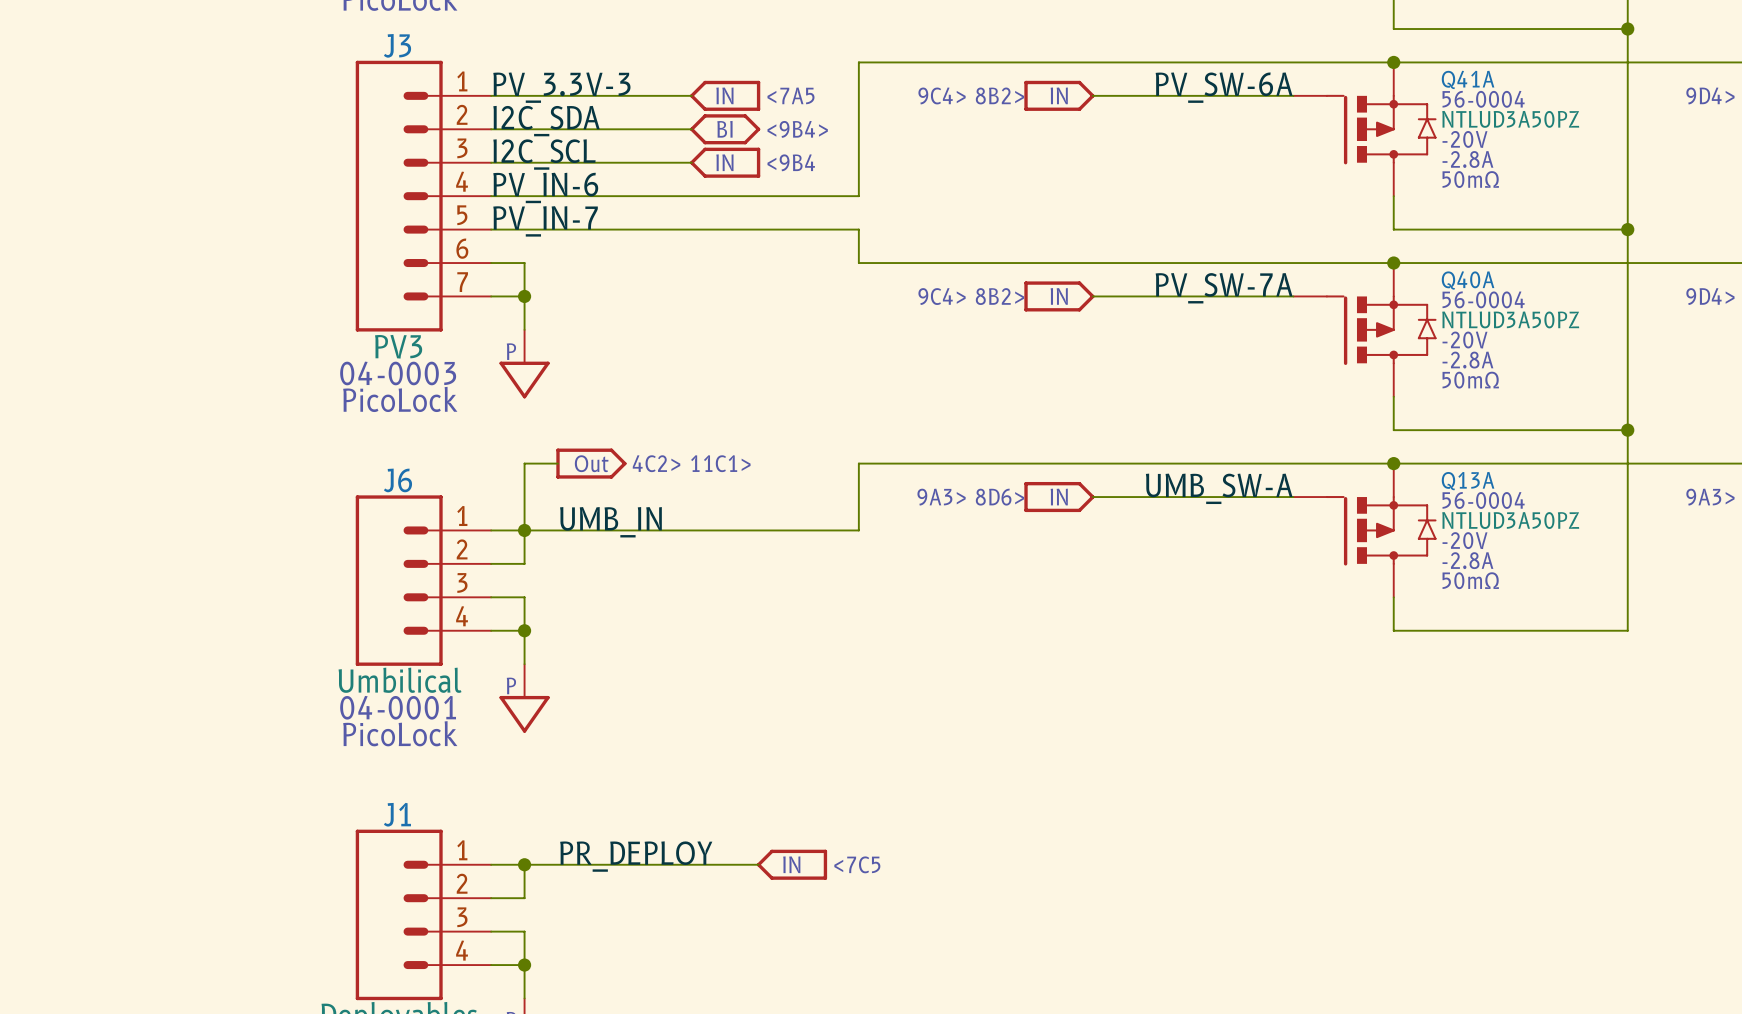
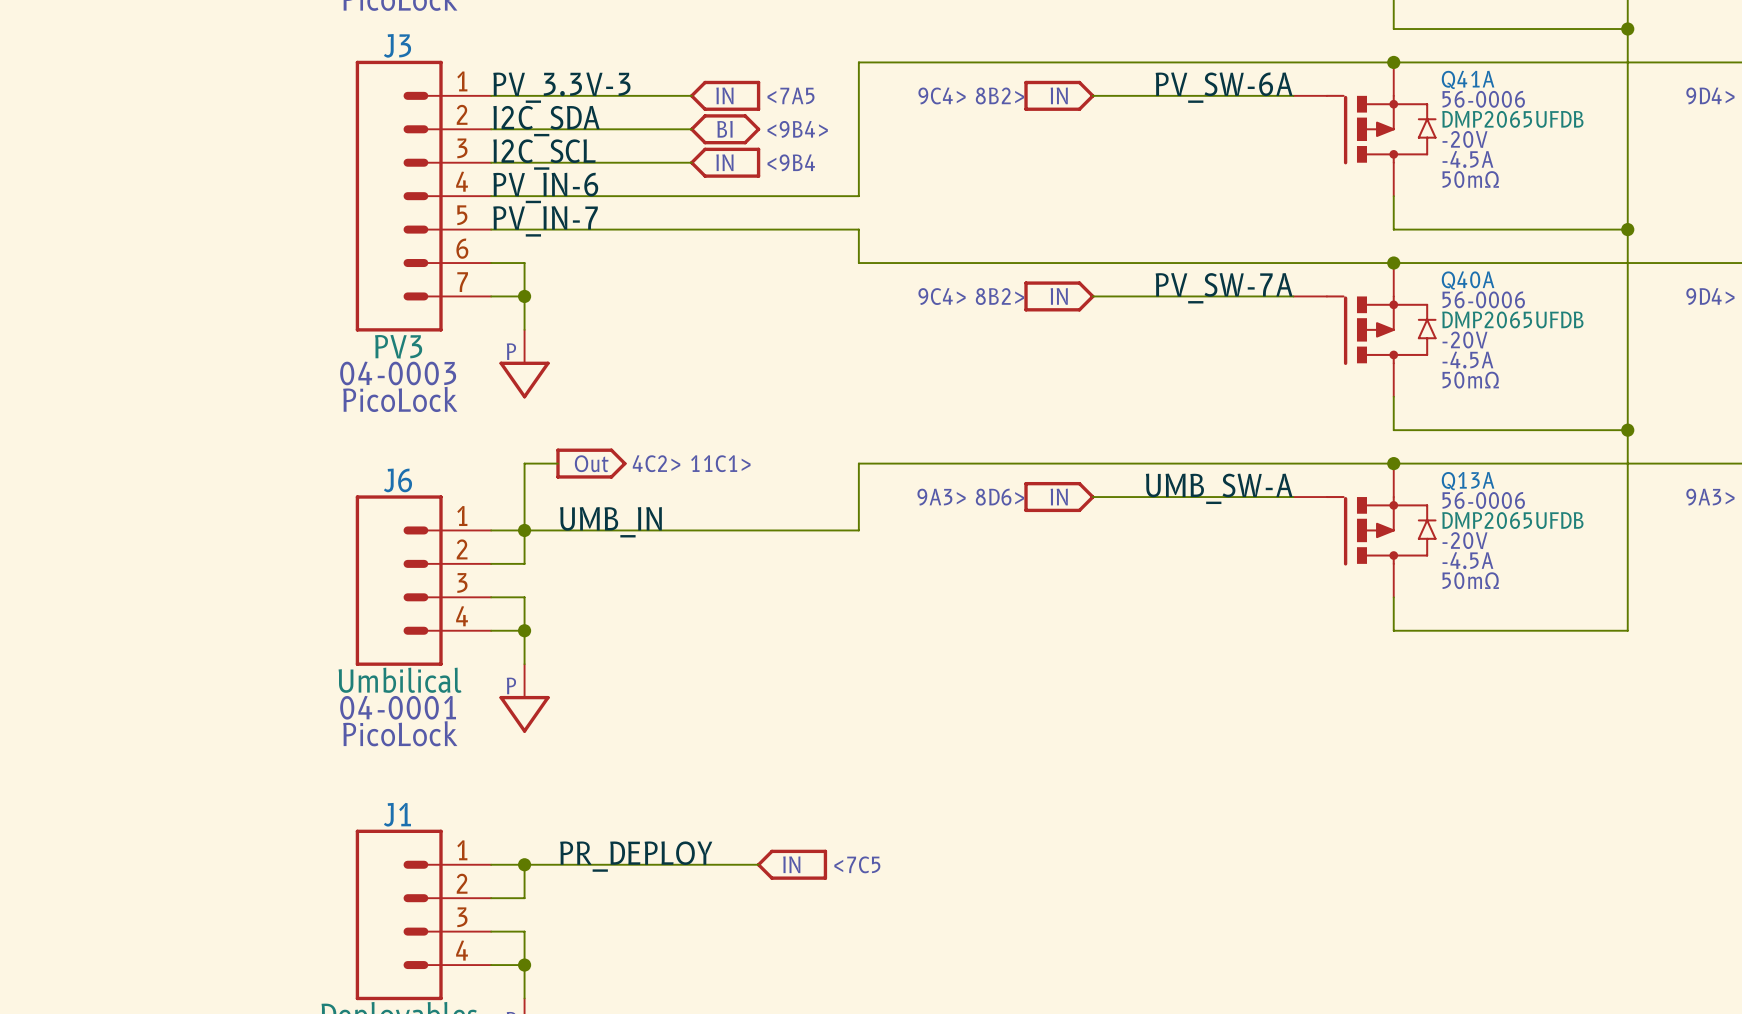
Q41A text: 56-0004 (1483, 99) -> 56-0006 (1483, 99)
Q41A value: NTLUD3A50PZ (1510, 119) -> DMP2065UFDB (1512, 119)
Q41A text: -2.8A (1467, 159) -> -4.5A (1467, 159)
Q40A text: 56-0004 (1483, 299) -> 56-0006 (1483, 299)
Q40A value: NTLUD3A50PZ (1510, 319) -> DMP2065UFDB (1512, 319)
Q40A text: -2.8A (1467, 360) -> -4.5A (1467, 360)
Q13A text: 56-0004 (1483, 500) -> 56-0006 (1483, 500)
Q13A value: NTLUD3A50PZ (1510, 520) -> DMP2065UFDB (1512, 520)
Q13A text: -2.8A (1467, 560) -> -4.5A (1467, 560)

